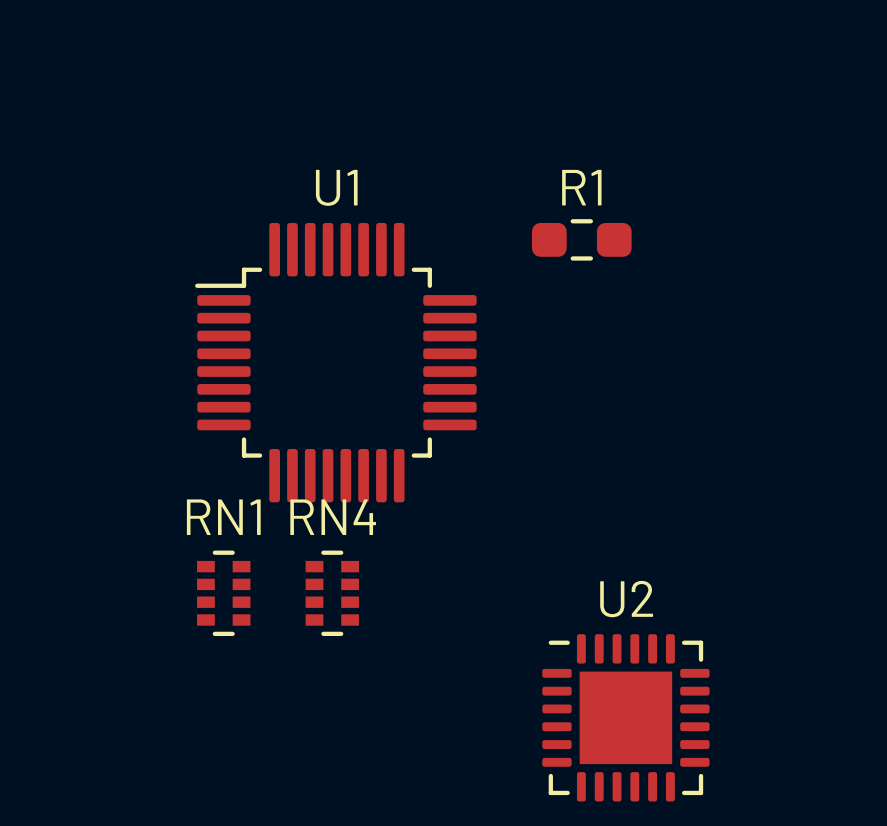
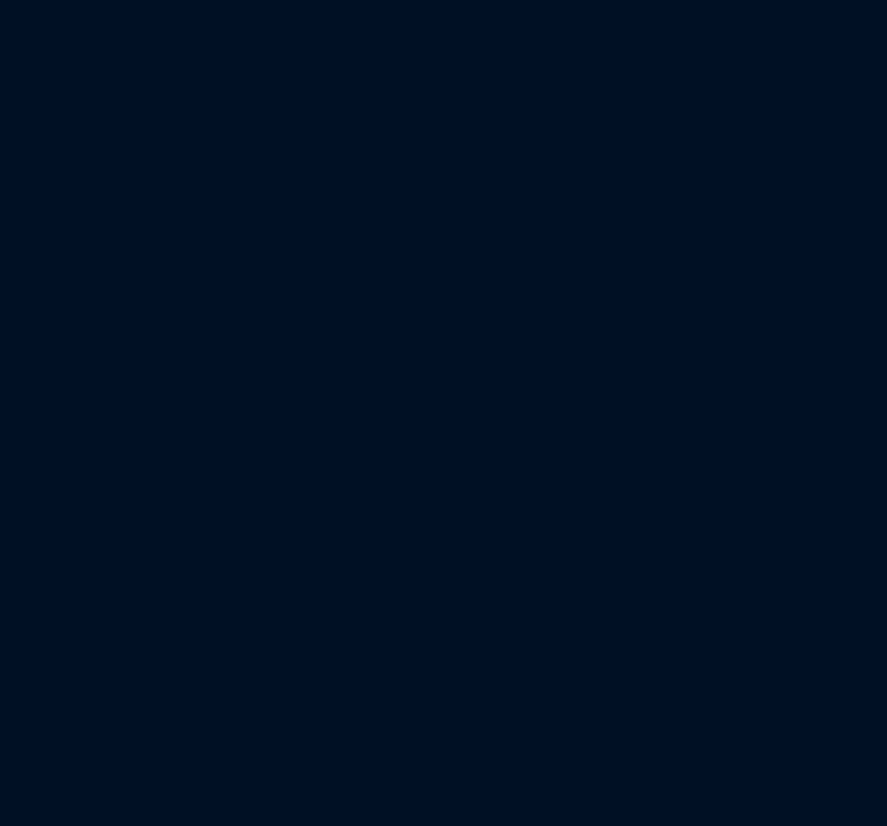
R1: (581, 239) -> none
U1: (335, 362) -> none
RN1: (223, 593) -> none
RN4: (332, 593) -> none
U2: (625, 717) -> none

